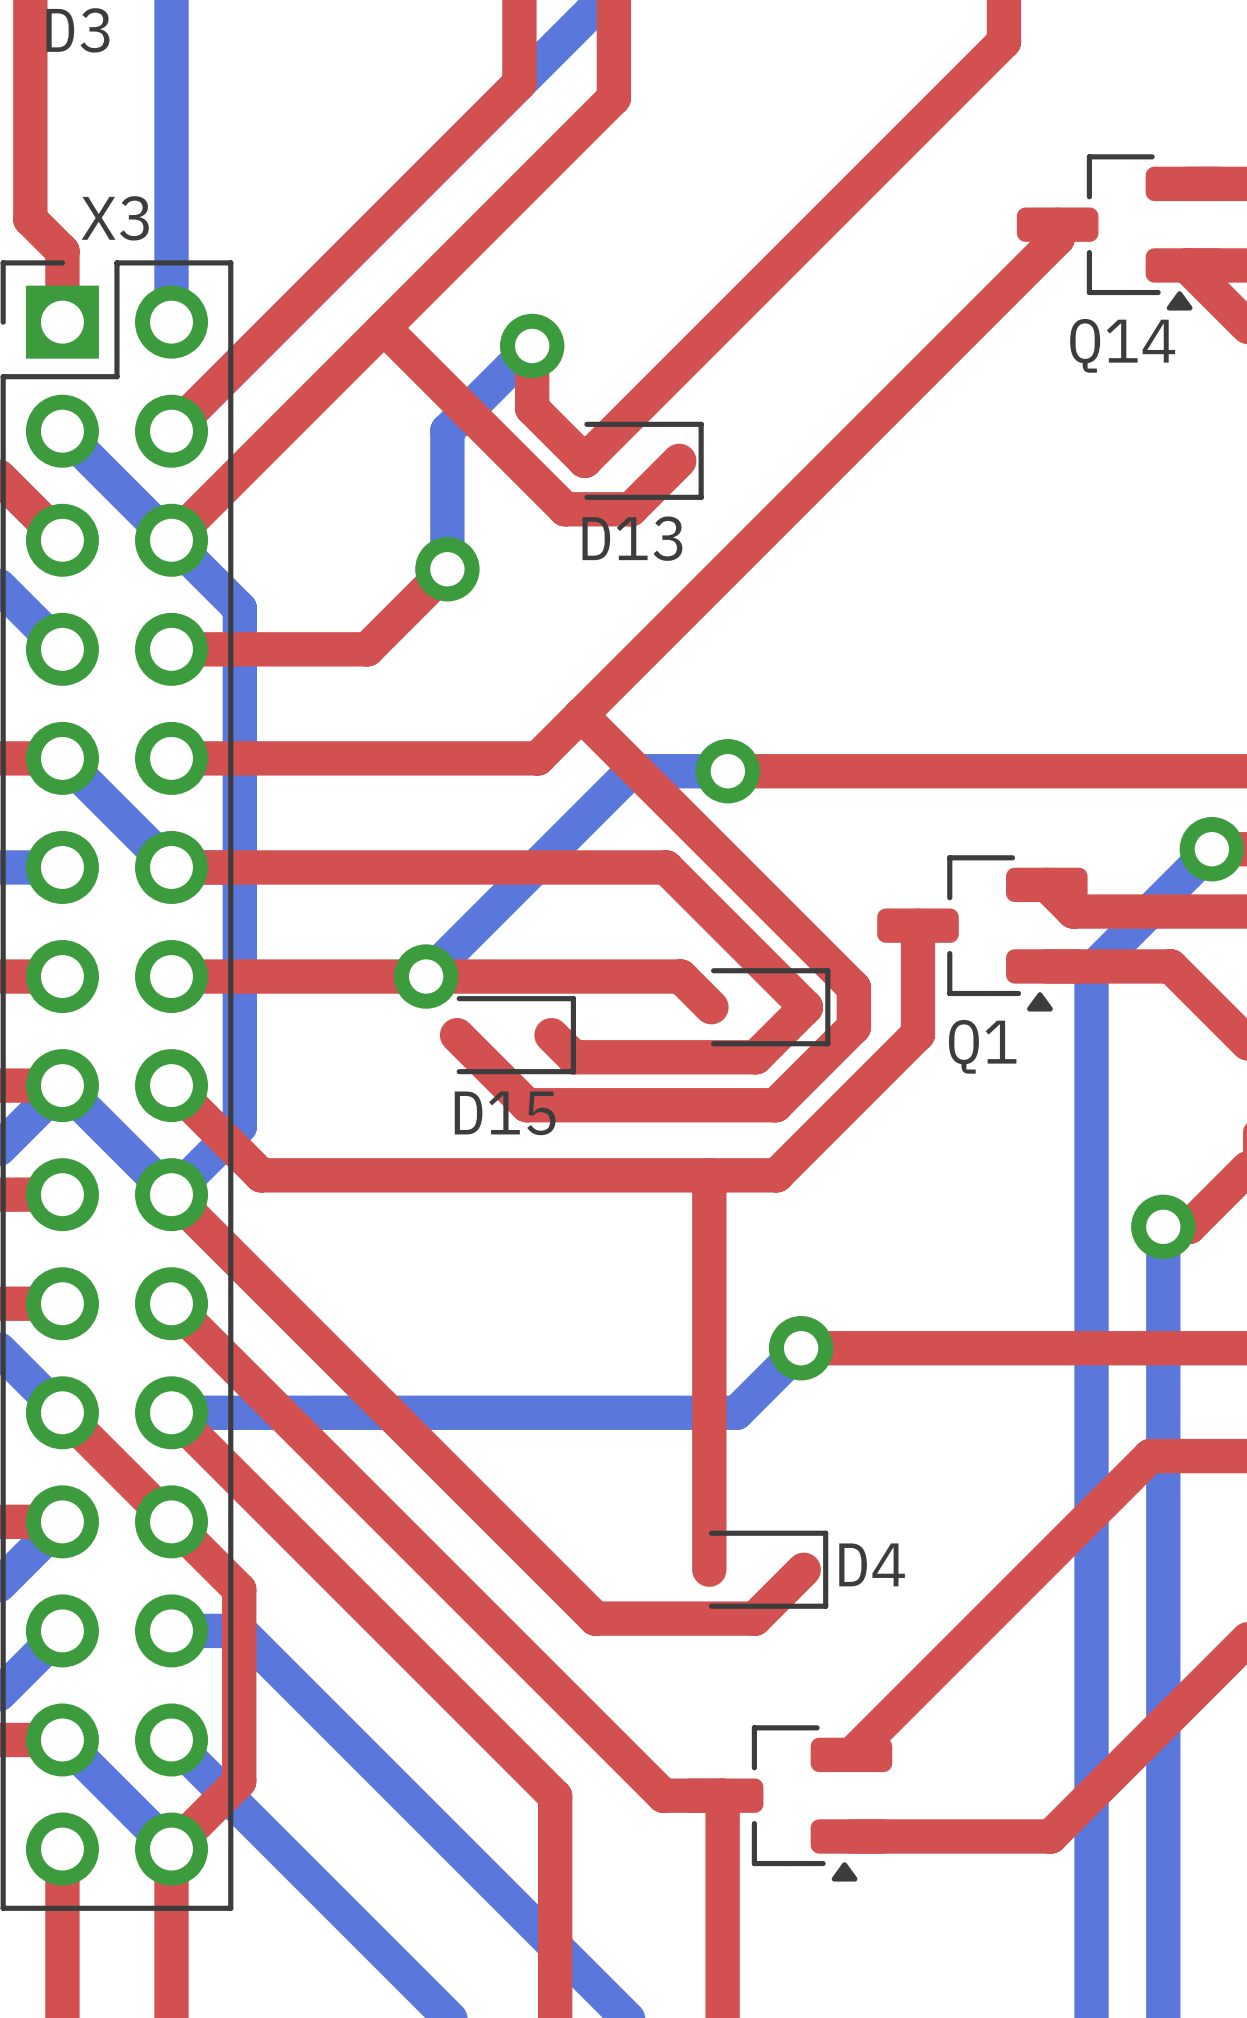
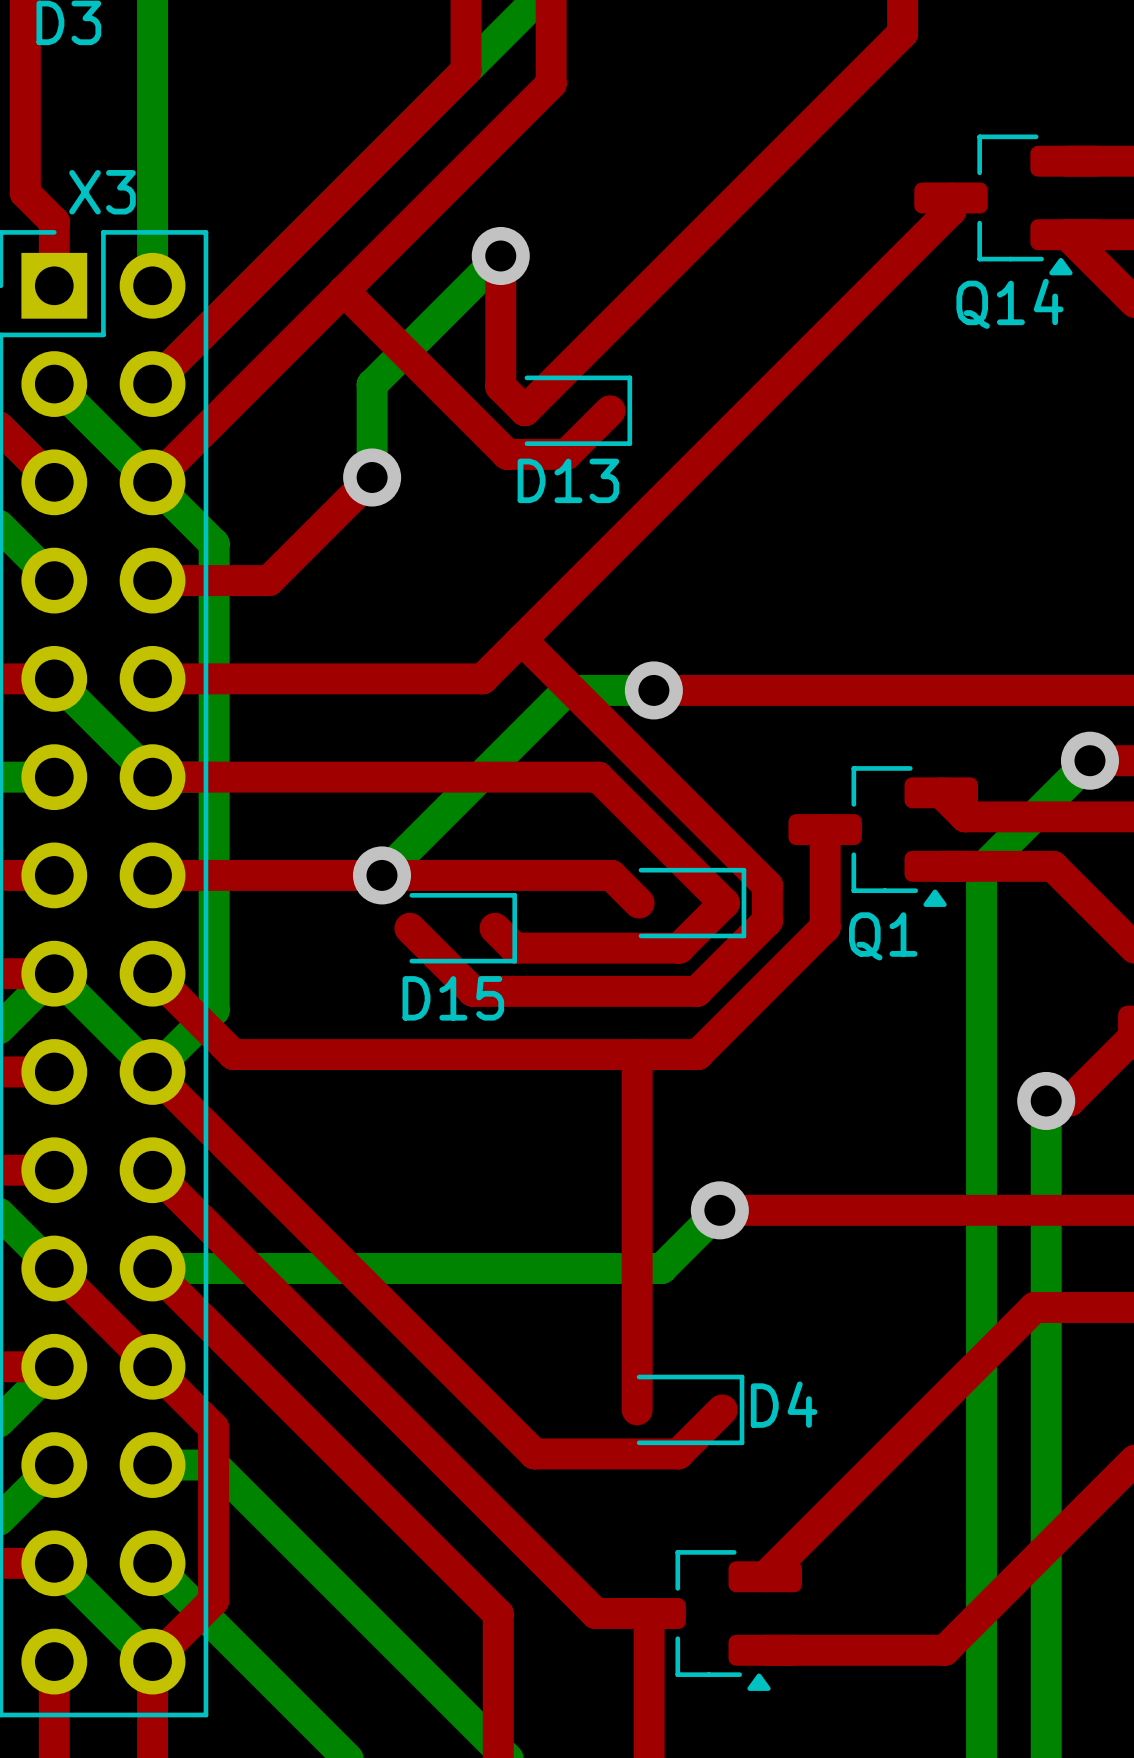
bottom track: none -> (500, 255) (372, 384) (372, 477)
top track: (532, 345) (532, 408) (557, 434) -> (500, 255) (500, 386)
bottom track: (532, 345) (447, 430) (447, 569) -> none
via position: (532, 345) -> (500, 255)
top track: (447, 569) (367, 649) (300, 649) -> (372, 477) (269, 580)
via position: (447, 569) -> (372, 477)

